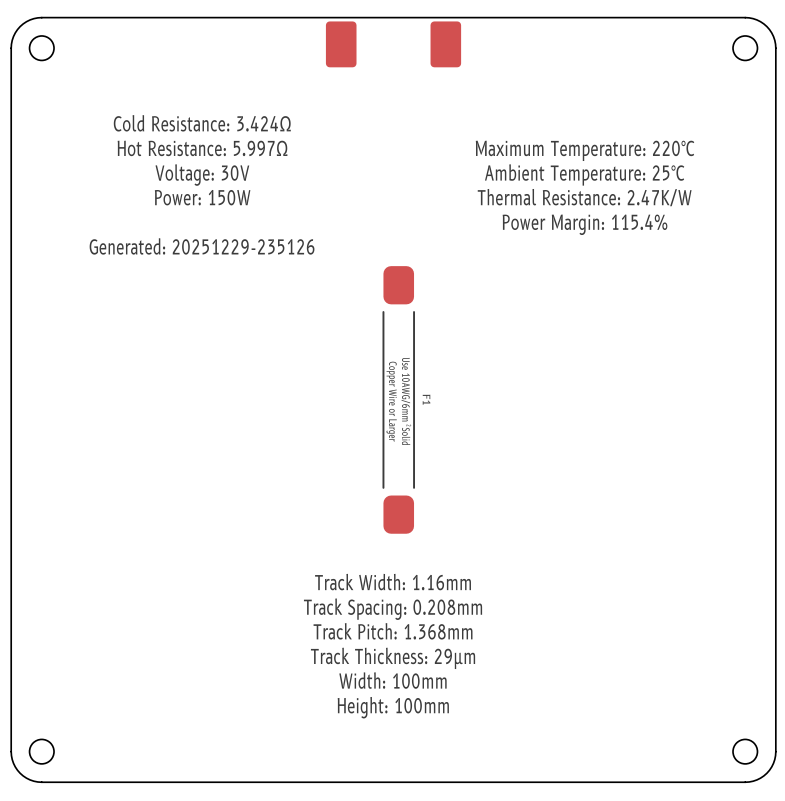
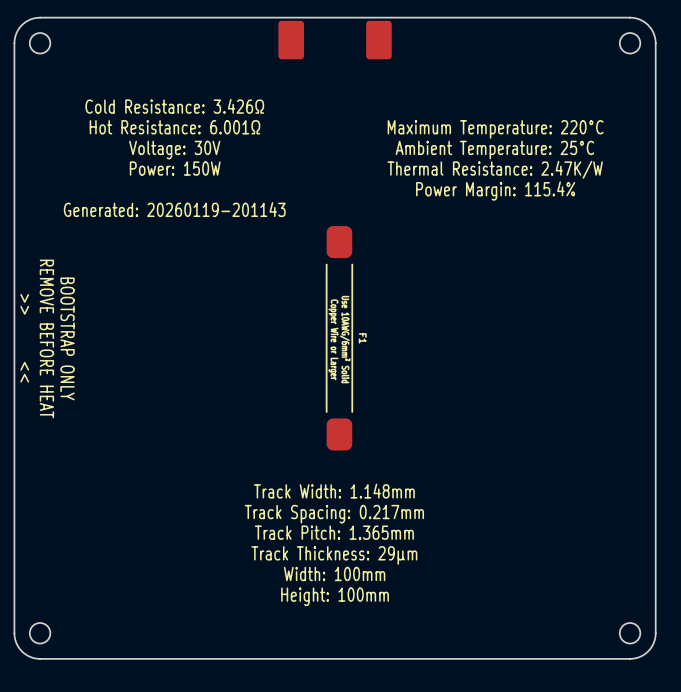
text: Cold Resistance: 3.424Ω (202, 123) -> Cold Resistance: 3.426Ω (174, 106)
text: Hot Resistance: 5.997Ω (202, 148) -> Hot Resistance: 6.001Ω (174, 127)
text: Generated: 20251229-235126 (202, 246) -> Generated: 20260119-201143 (174, 209)
text: none -> >> << (24, 338)
text: none -> REMOVE BEFORE HEAT (46, 338)
text: none -> BOOTSTRAP ONLY (67, 338)
text: Track Width: 1.16mm (393, 582) -> Track Width: 1.148mm (334, 491)
text: Track Spacing: 0.208mm (393, 609) -> Track Spacing: 0.217mm (334, 514)
text: Track Pitch: 1.368mm (393, 631) -> Track Pitch: 1.365mm (334, 532)

